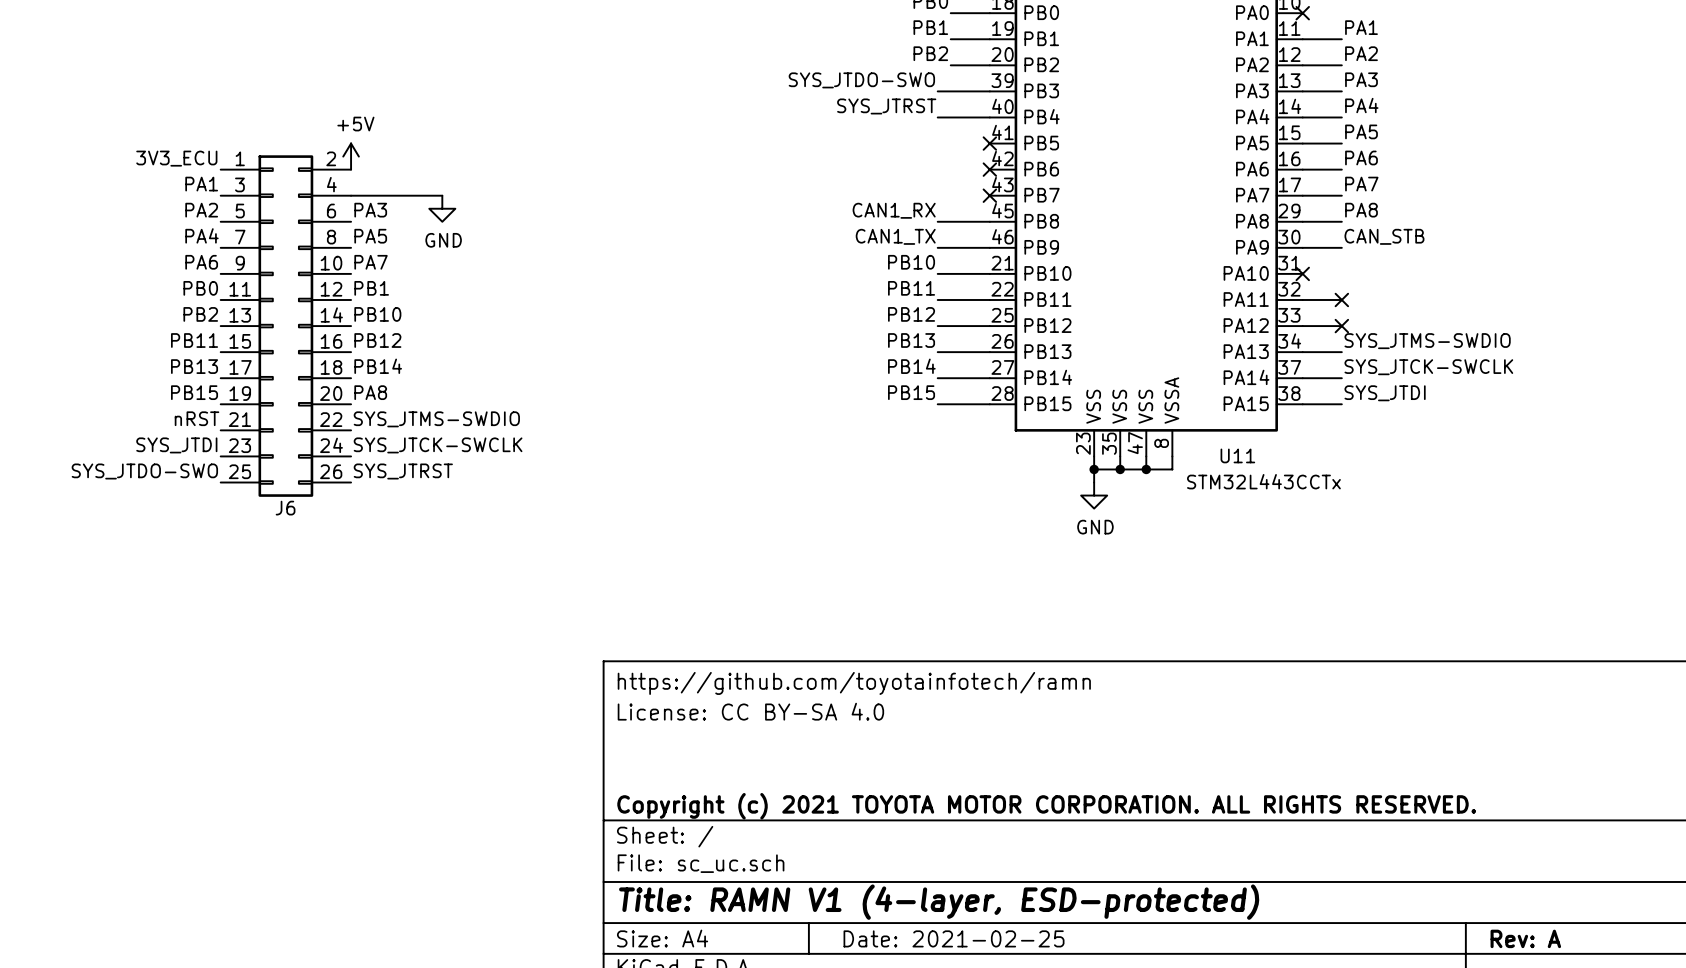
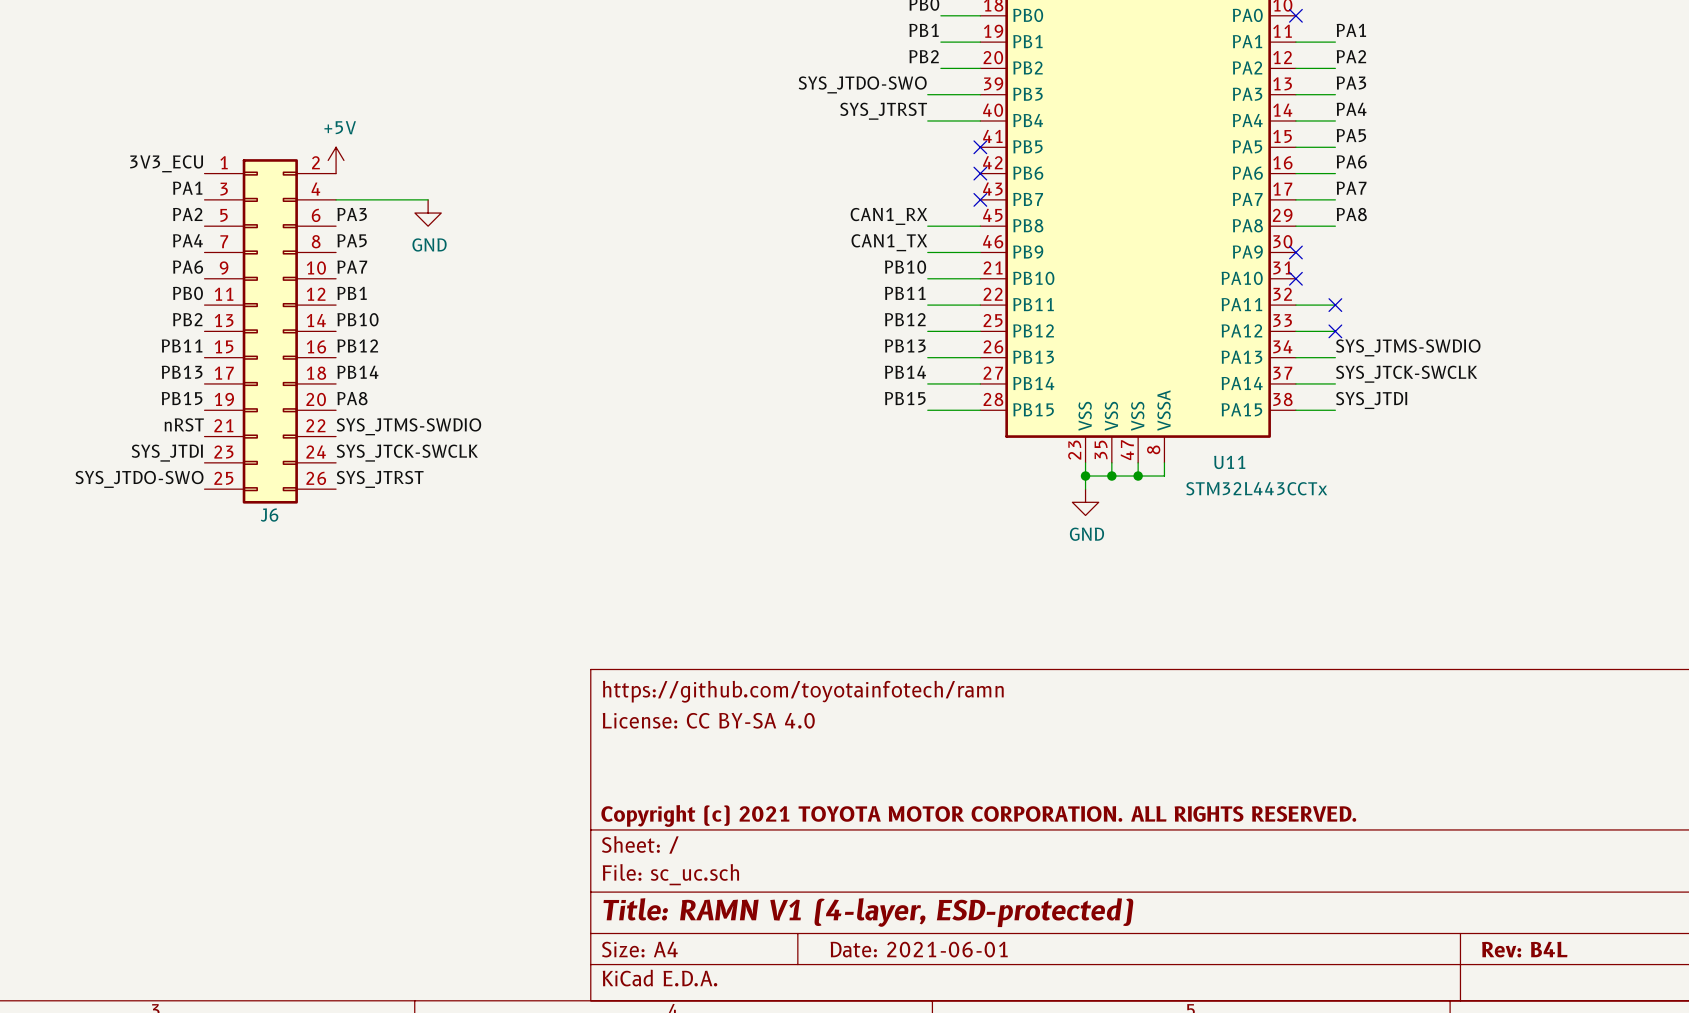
label: CAN_STB (1384, 236) -> none
wire: (1302, 247) (1341, 247) -> none
no-connect mark: none -> (1295, 252)
title block: Date: 2021-02-25 (954, 938) -> Date: 2021-06-01 (919, 949)
title block: Rev: A (1525, 938) -> Rev: B4L (1524, 949)

